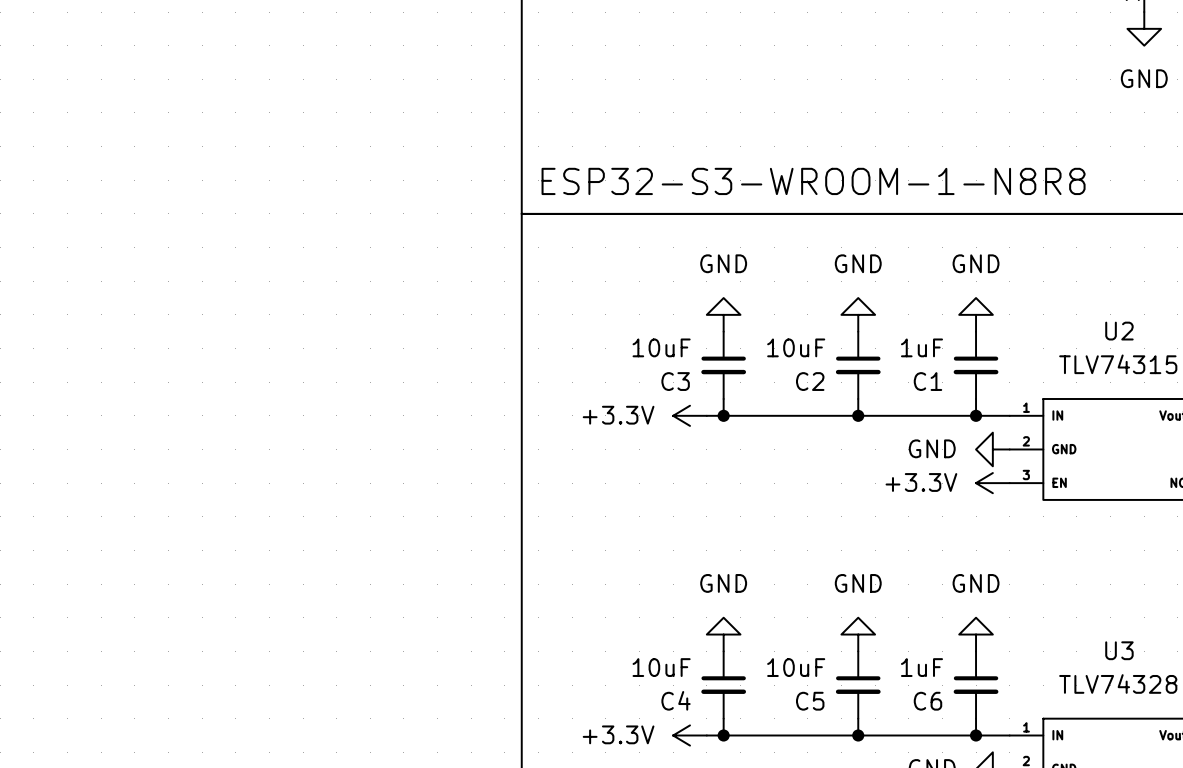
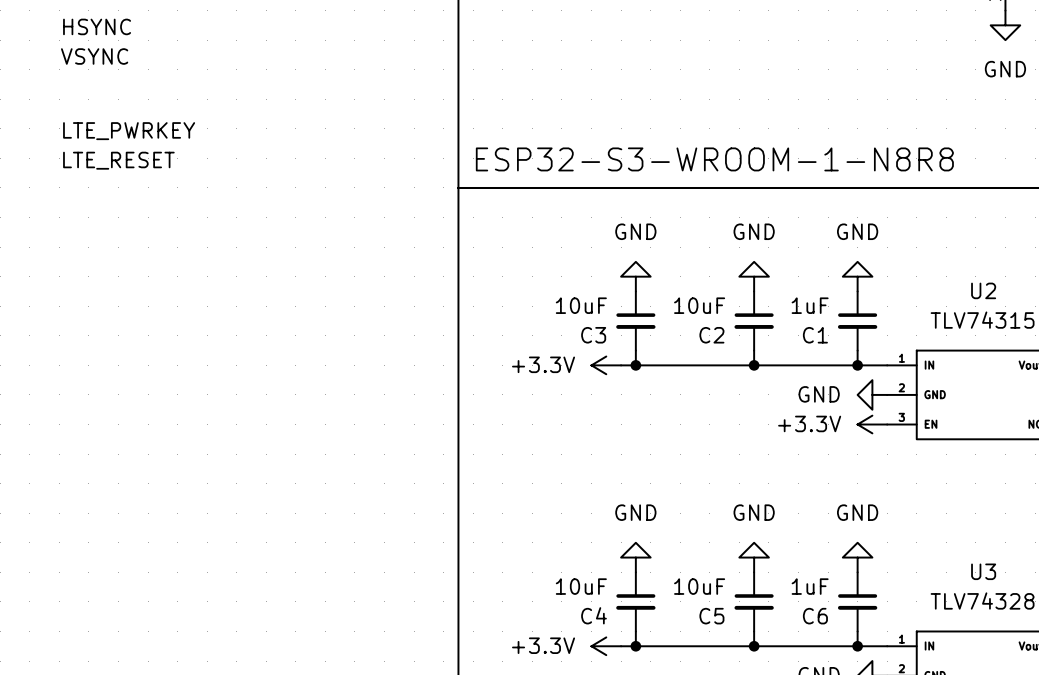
label: none -> HSYNC (97, 26)
label: none -> VSYNC (94, 56)
label: none -> LTE_PWRKEY (129, 131)
label: none -> LTE_RESET (118, 160)

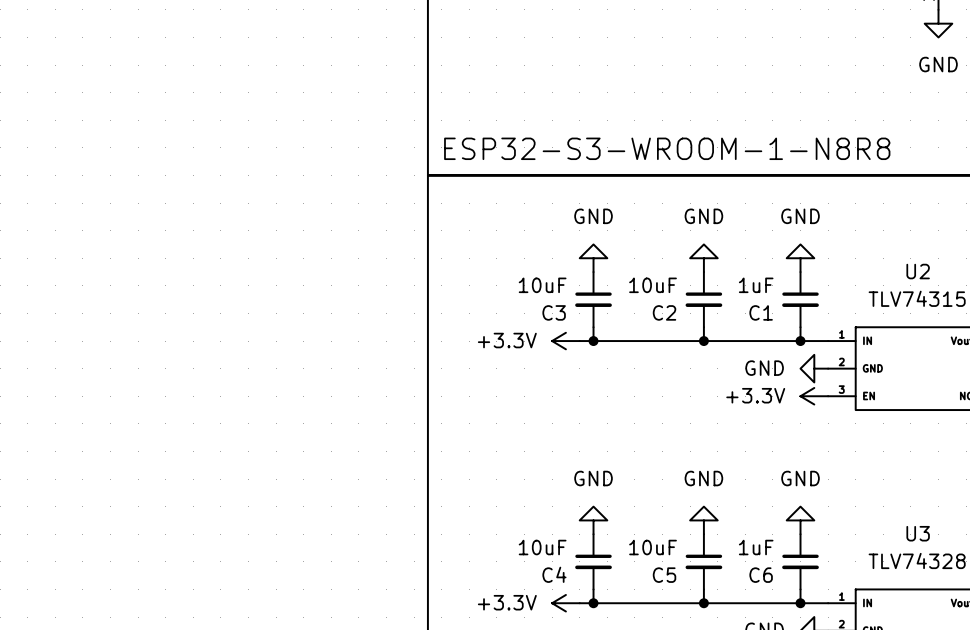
label: HSYNC (97, 26) -> none
label: VSYNC (94, 56) -> none
label: LTE_PWRKEY (129, 131) -> none
label: LTE_RESET (118, 160) -> none

